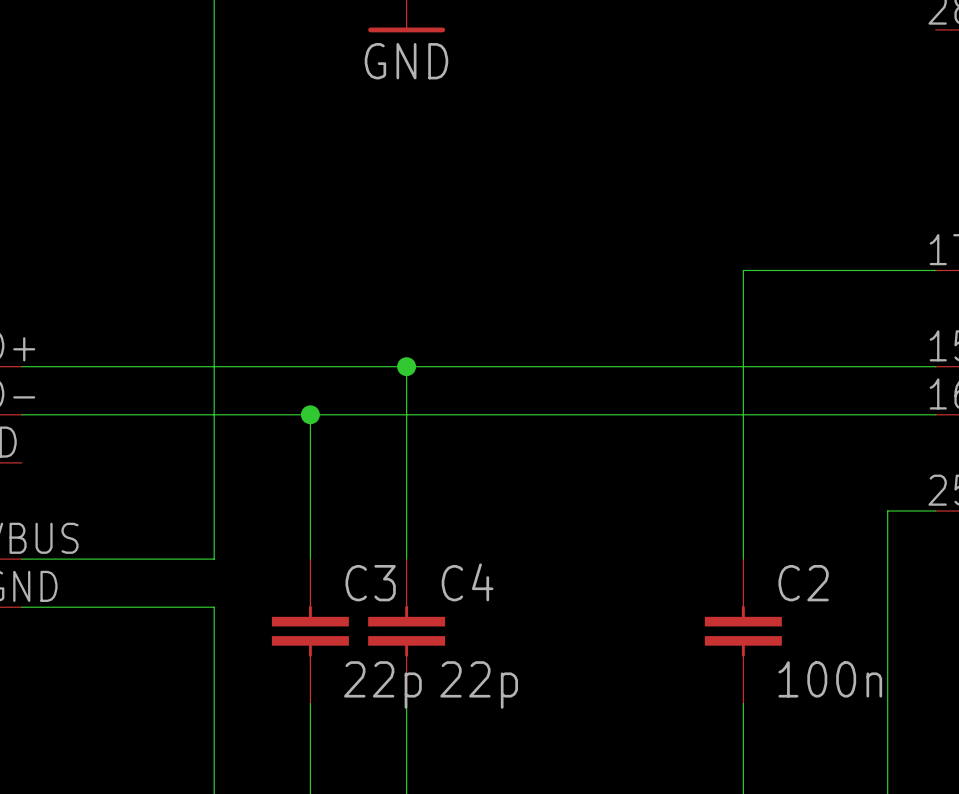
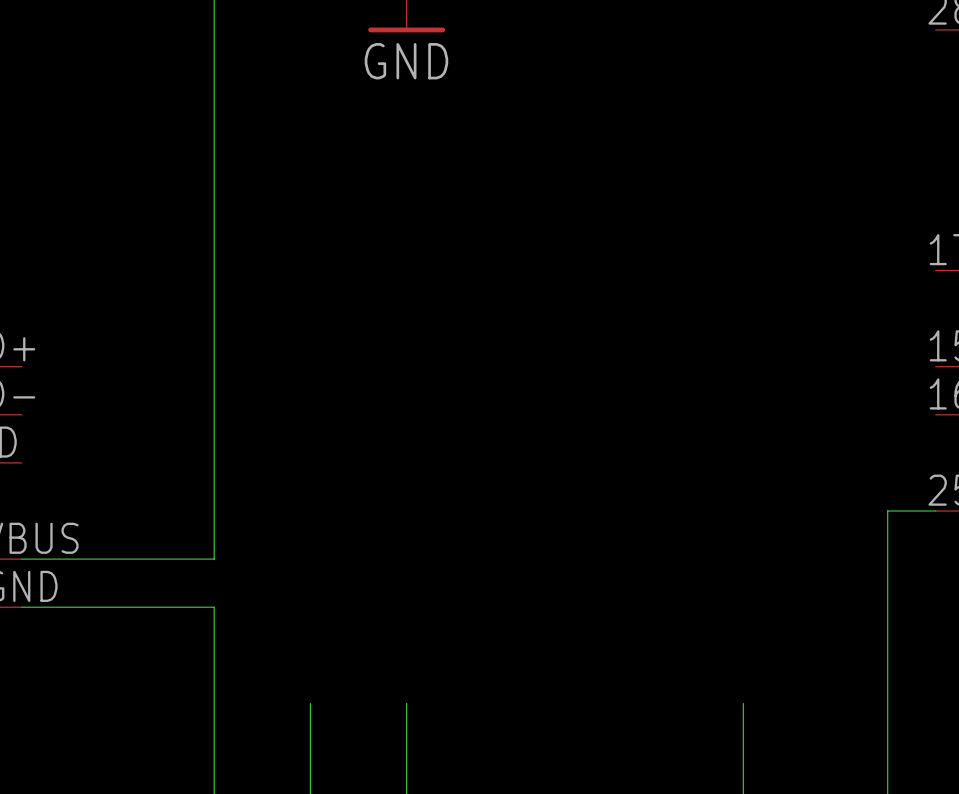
wire: (935, 270) (743, 270) (743, 559) -> none
wire: (21, 366) (935, 366) -> none
wire: (406, 366) (406, 559) -> none
junction: (406, 366) -> none
wire: (21, 414) (935, 414) -> none
wire: (310, 414) (310, 559) -> none
junction: (310, 414) -> none
C3: 22p (310, 631) -> none
C4: 22p (406, 631) -> none
C2: 100n (743, 631) -> none

